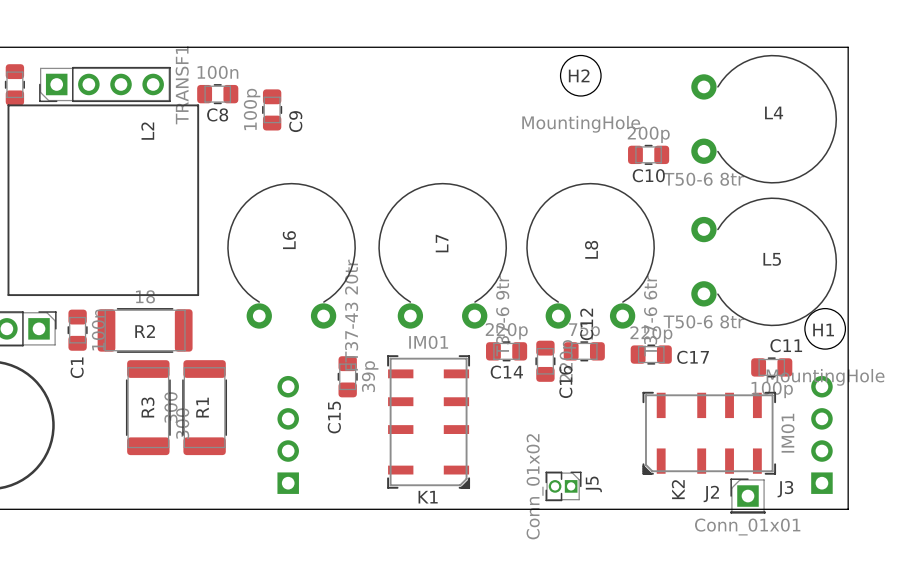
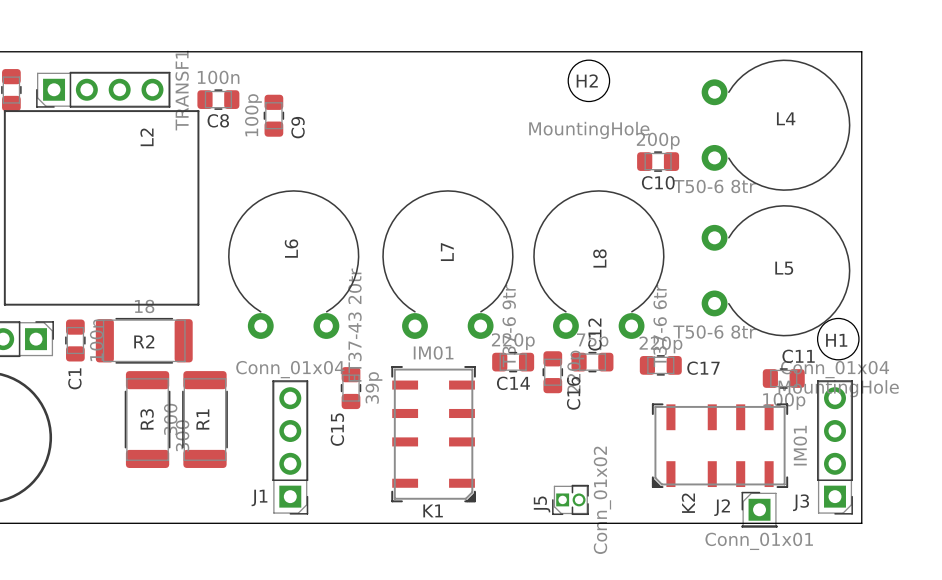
J1 side: bottom (288, 434) -> top (290, 447)
J3 side: bottom (821, 434) -> top (835, 447)
J5 rotation: 0° (563, 486) -> 180° (570, 499)

